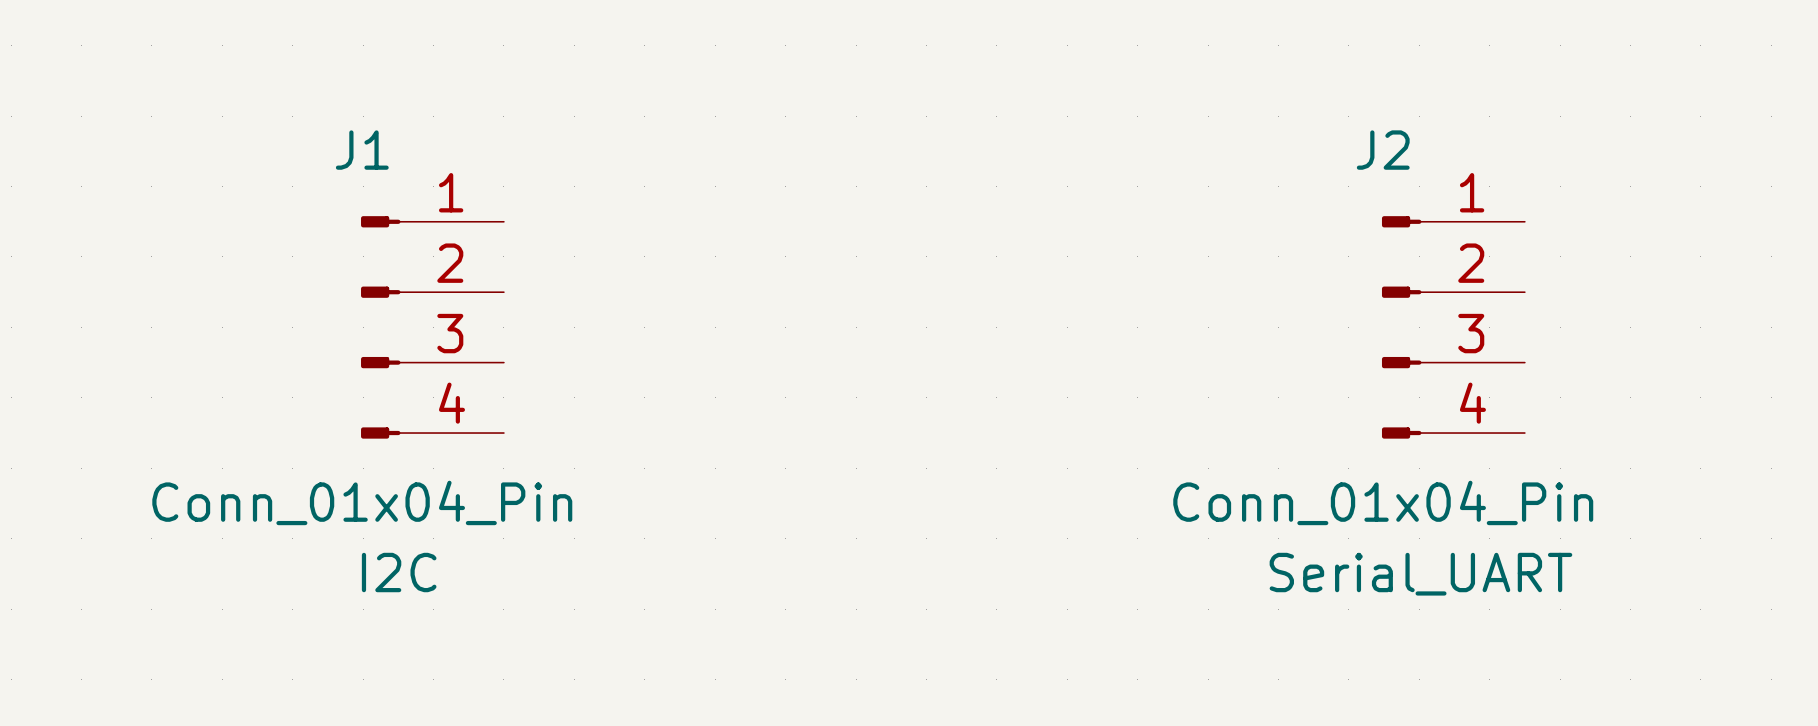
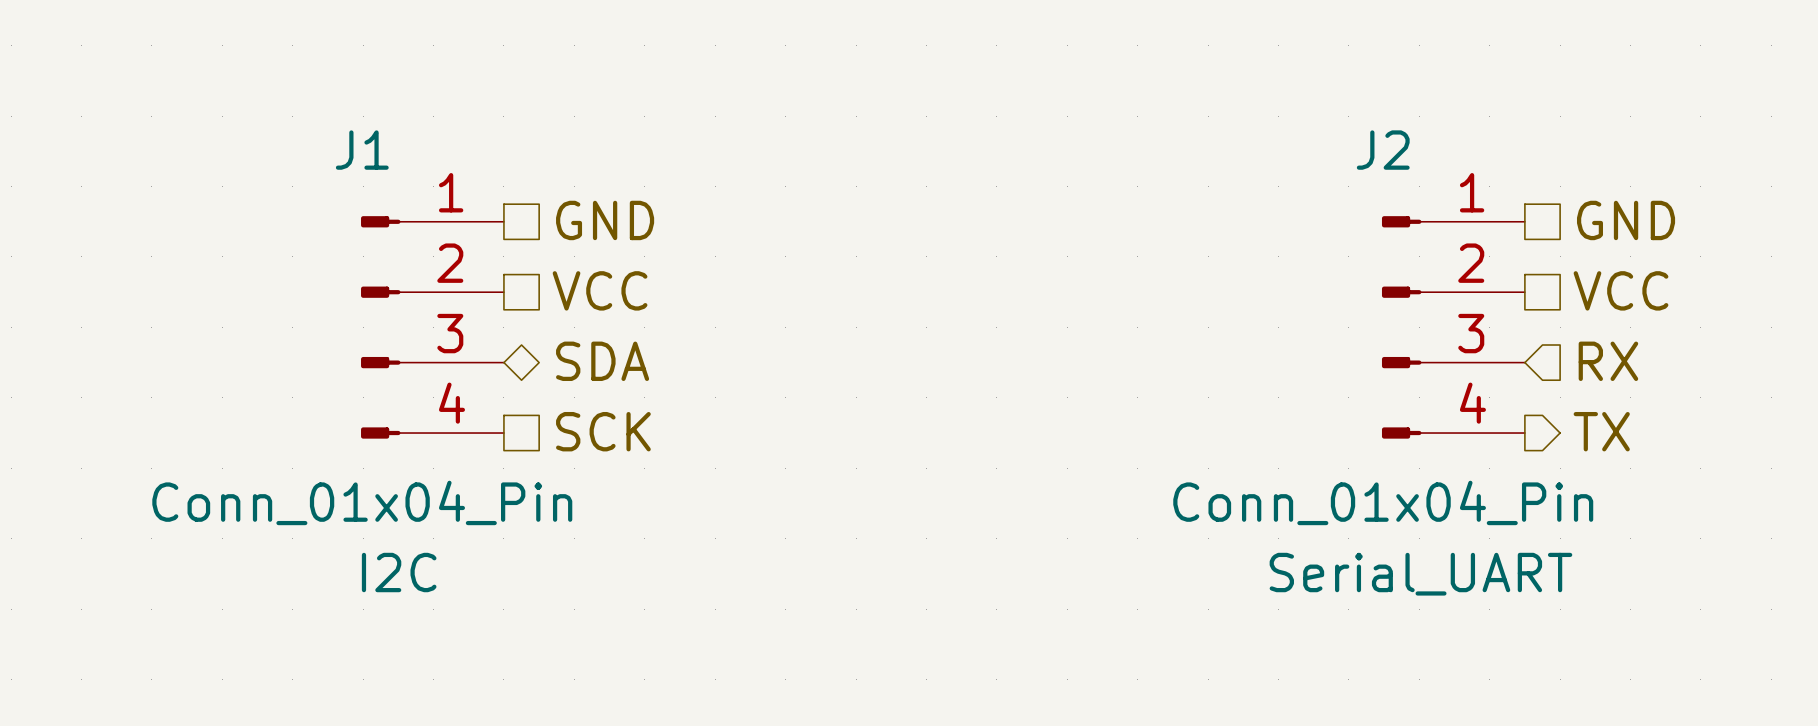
hierarchical label: none -> GND (605, 220)
hierarchical label: none -> GND (1626, 220)
hierarchical label: none -> VCC (600, 290)
hierarchical label: none -> VCC (1621, 290)
hierarchical label: none -> SDA (602, 361)
hierarchical label: none -> RX (1608, 361)
hierarchical label: none -> SCK (603, 431)
hierarchical label: none -> TX (1601, 431)

